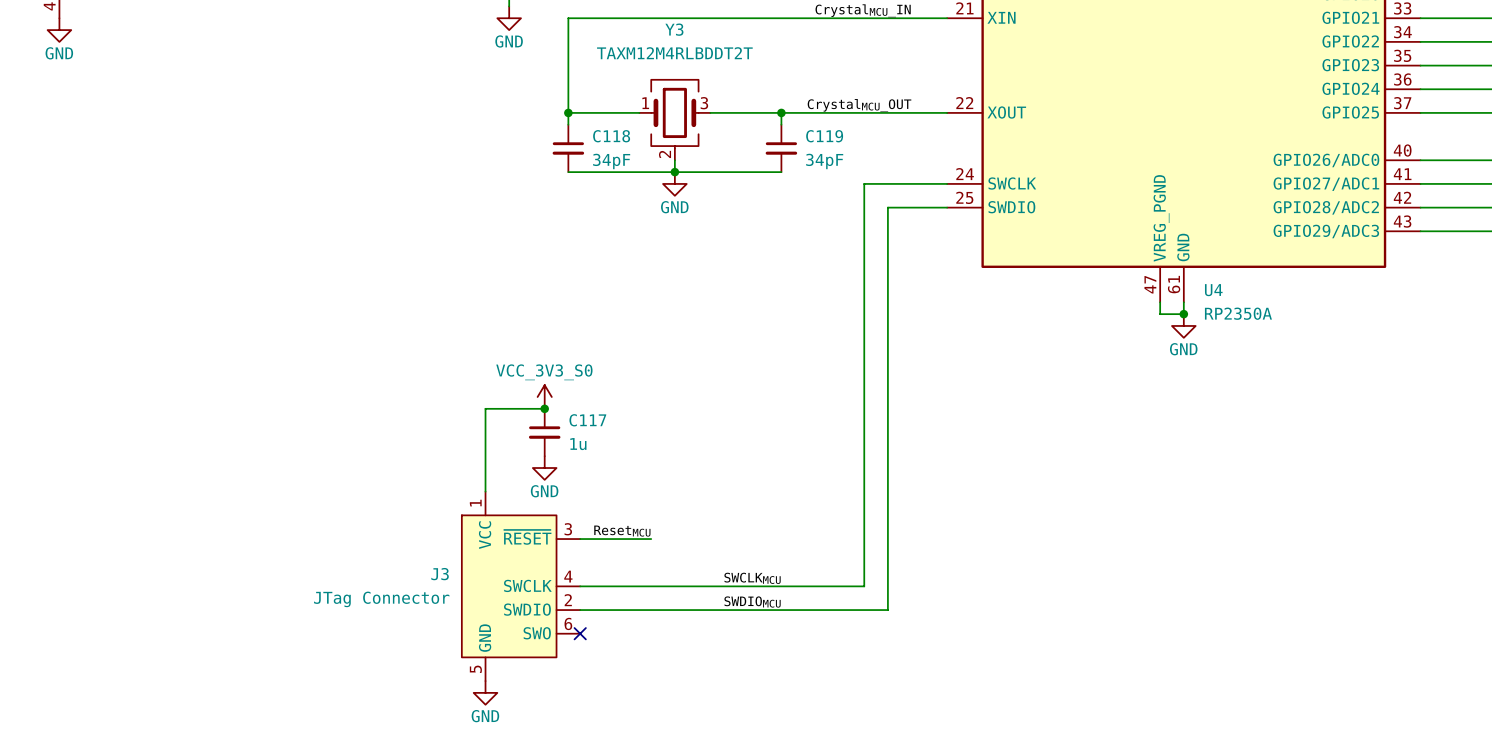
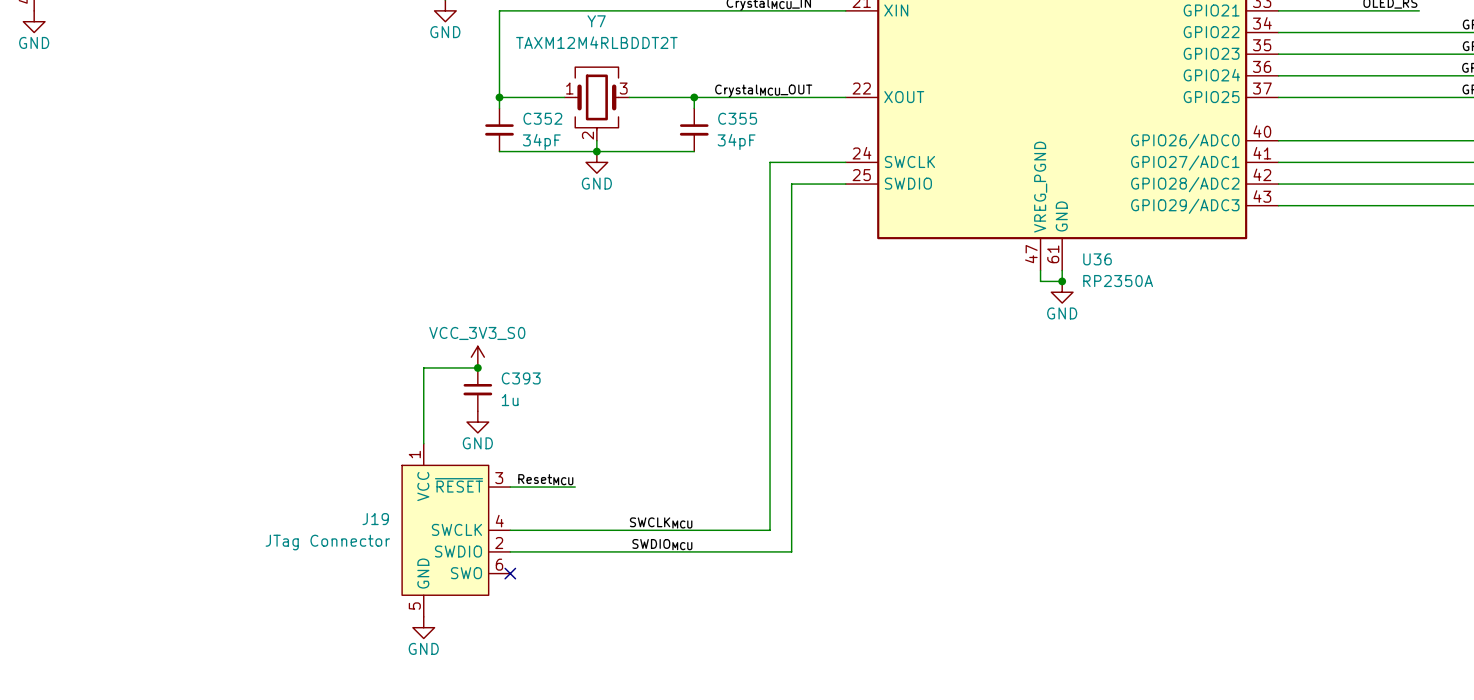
Y3 name: Y3 (674, 29) -> Y7 (596, 21)
C118 name: C118 (611, 136) -> C352 (542, 118)
C119 name: C119 (824, 136) -> C355 (737, 118)
U4 name: U4 (1213, 290) -> U36 (1097, 259)
C117 name: C117 (587, 420) -> C393 (521, 378)
J3 name: J3 (440, 574) -> J19 (375, 519)

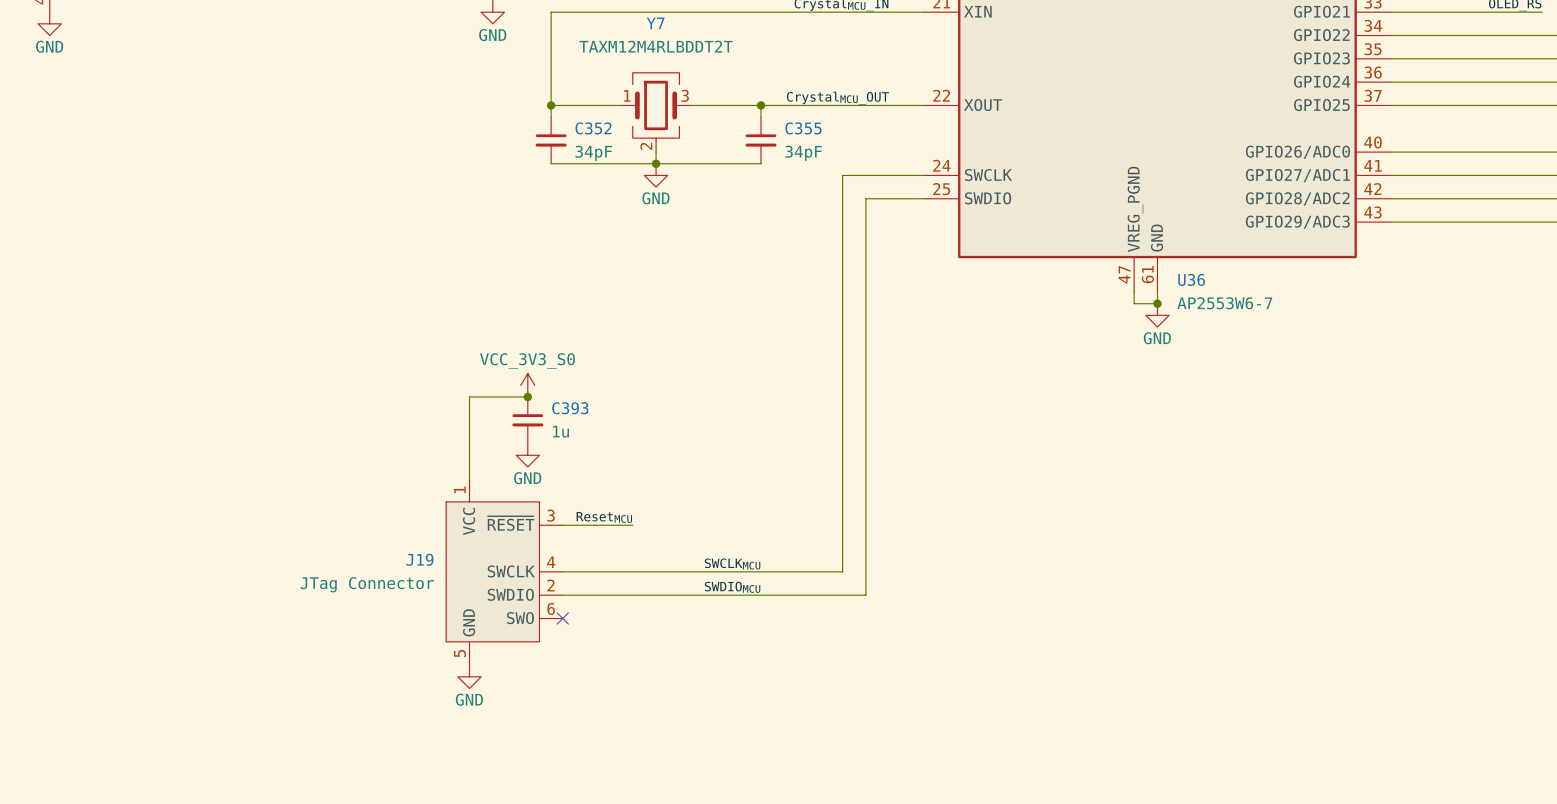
U36 value: RP2350A (1118, 281) -> AP2553W6-7 (1224, 303)

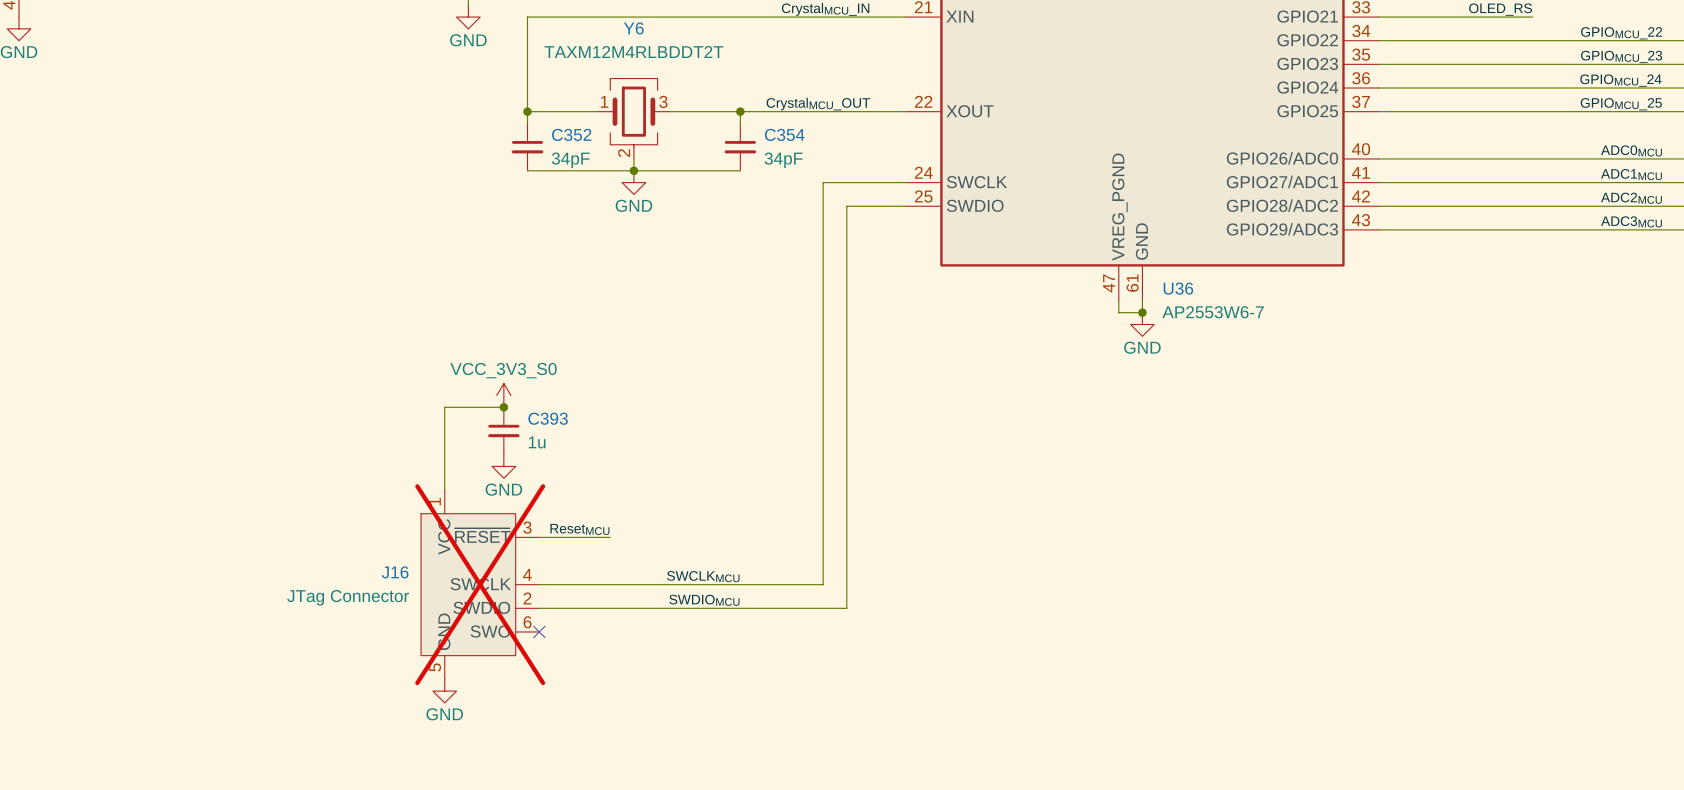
Y7 name: Y7 (655, 23) -> Y6 (633, 28)
C355 name: C355 (803, 128) -> C354 (784, 134)
J19 name: J19 (419, 559) -> J16 (395, 572)
J19 do-not-place cross: none -> (480, 584)

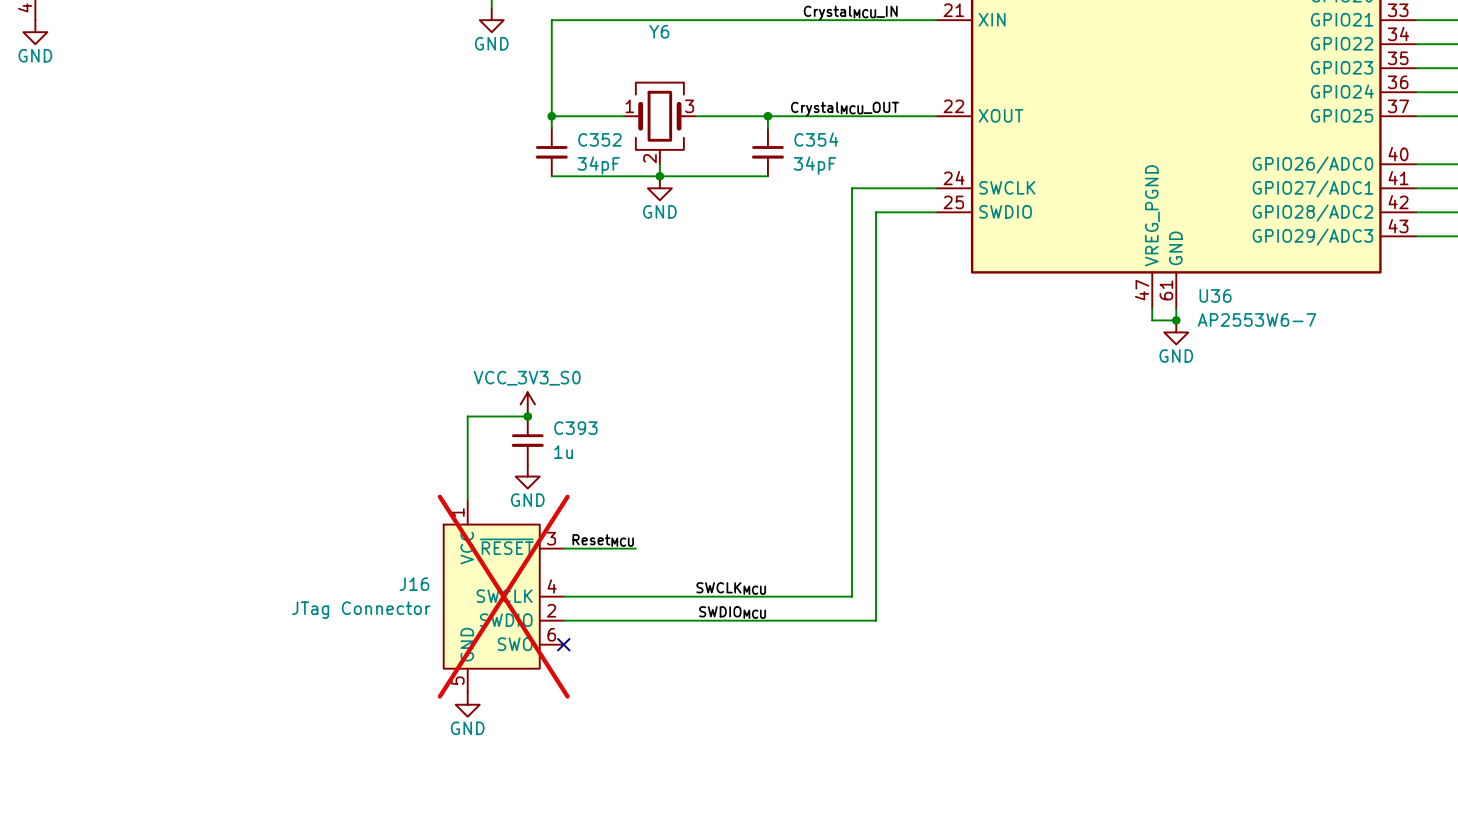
Y6 value: TAXM12M4RLBDDT2T (633, 52) -> none

